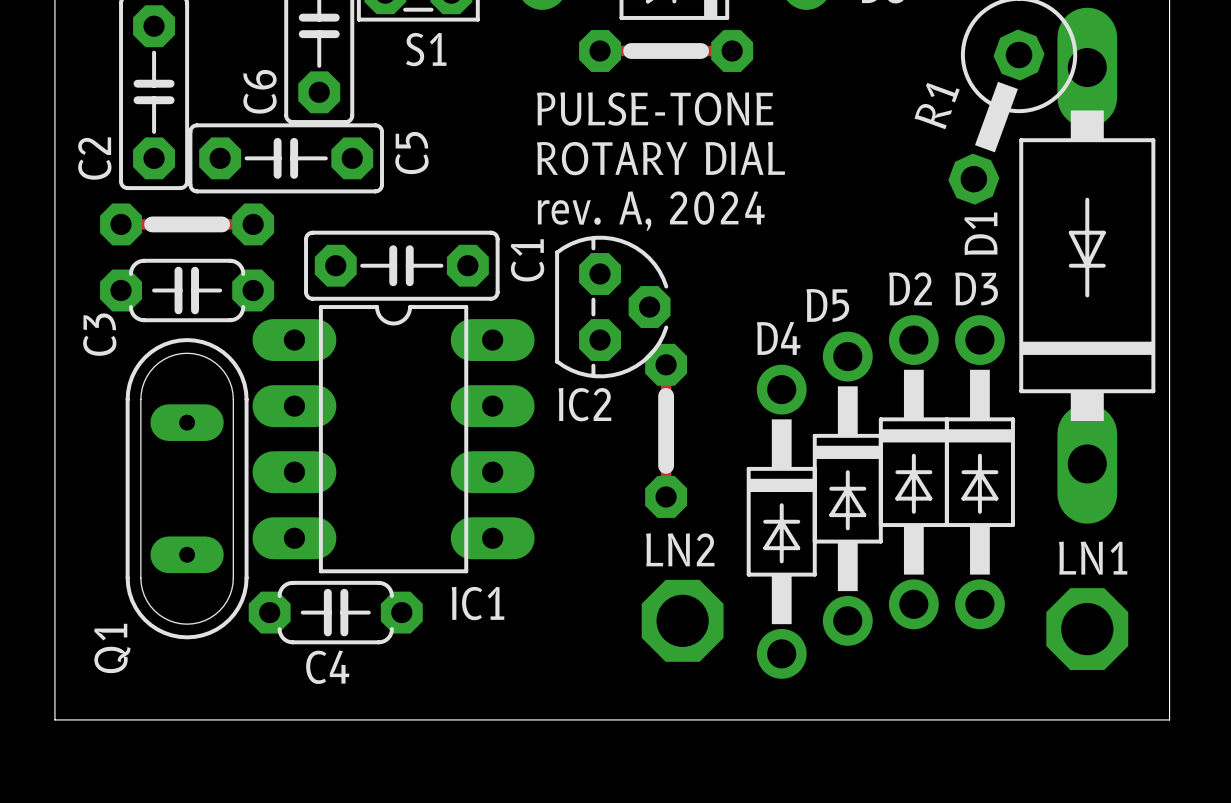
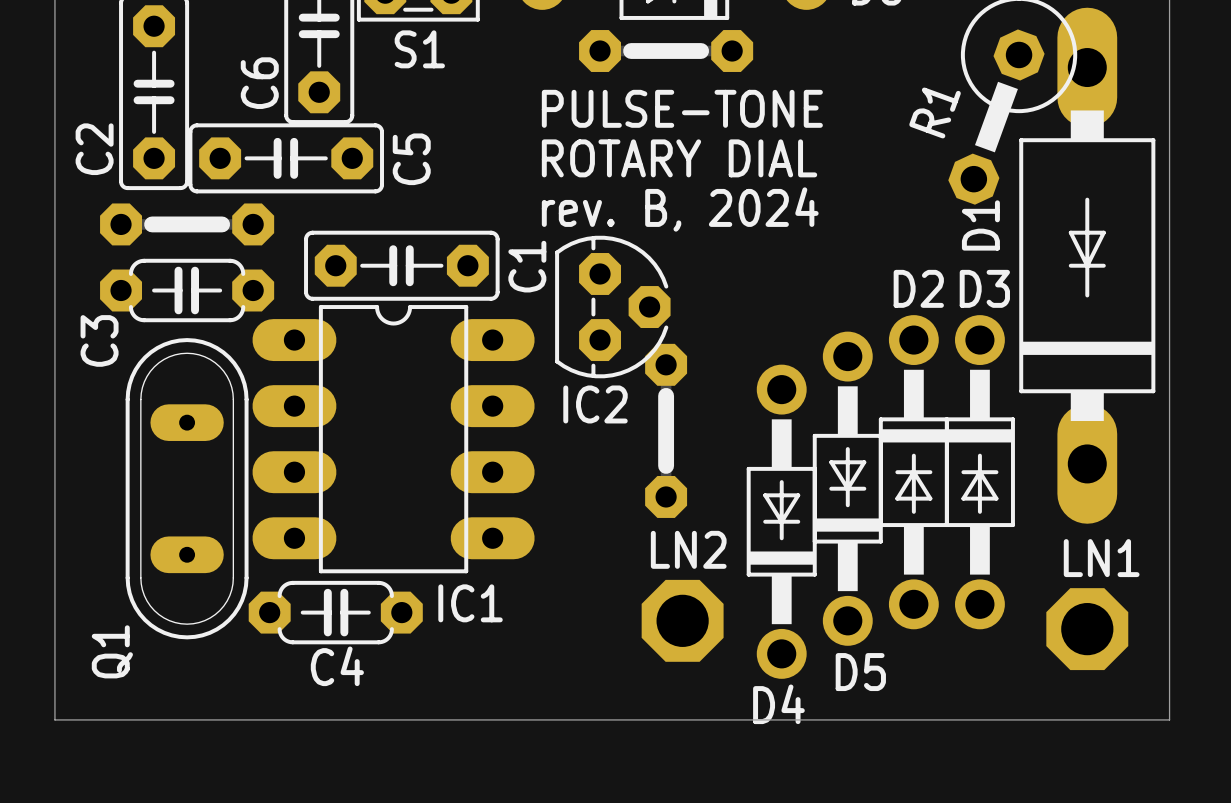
text: rev. A, 2024 (651, 211) -> rev. B, 2024 (680, 209)
D5 rotation: 0° (847, 488) -> 180° (847, 488)
D4 rotation: 0° (781, 521) -> 180° (781, 521)

